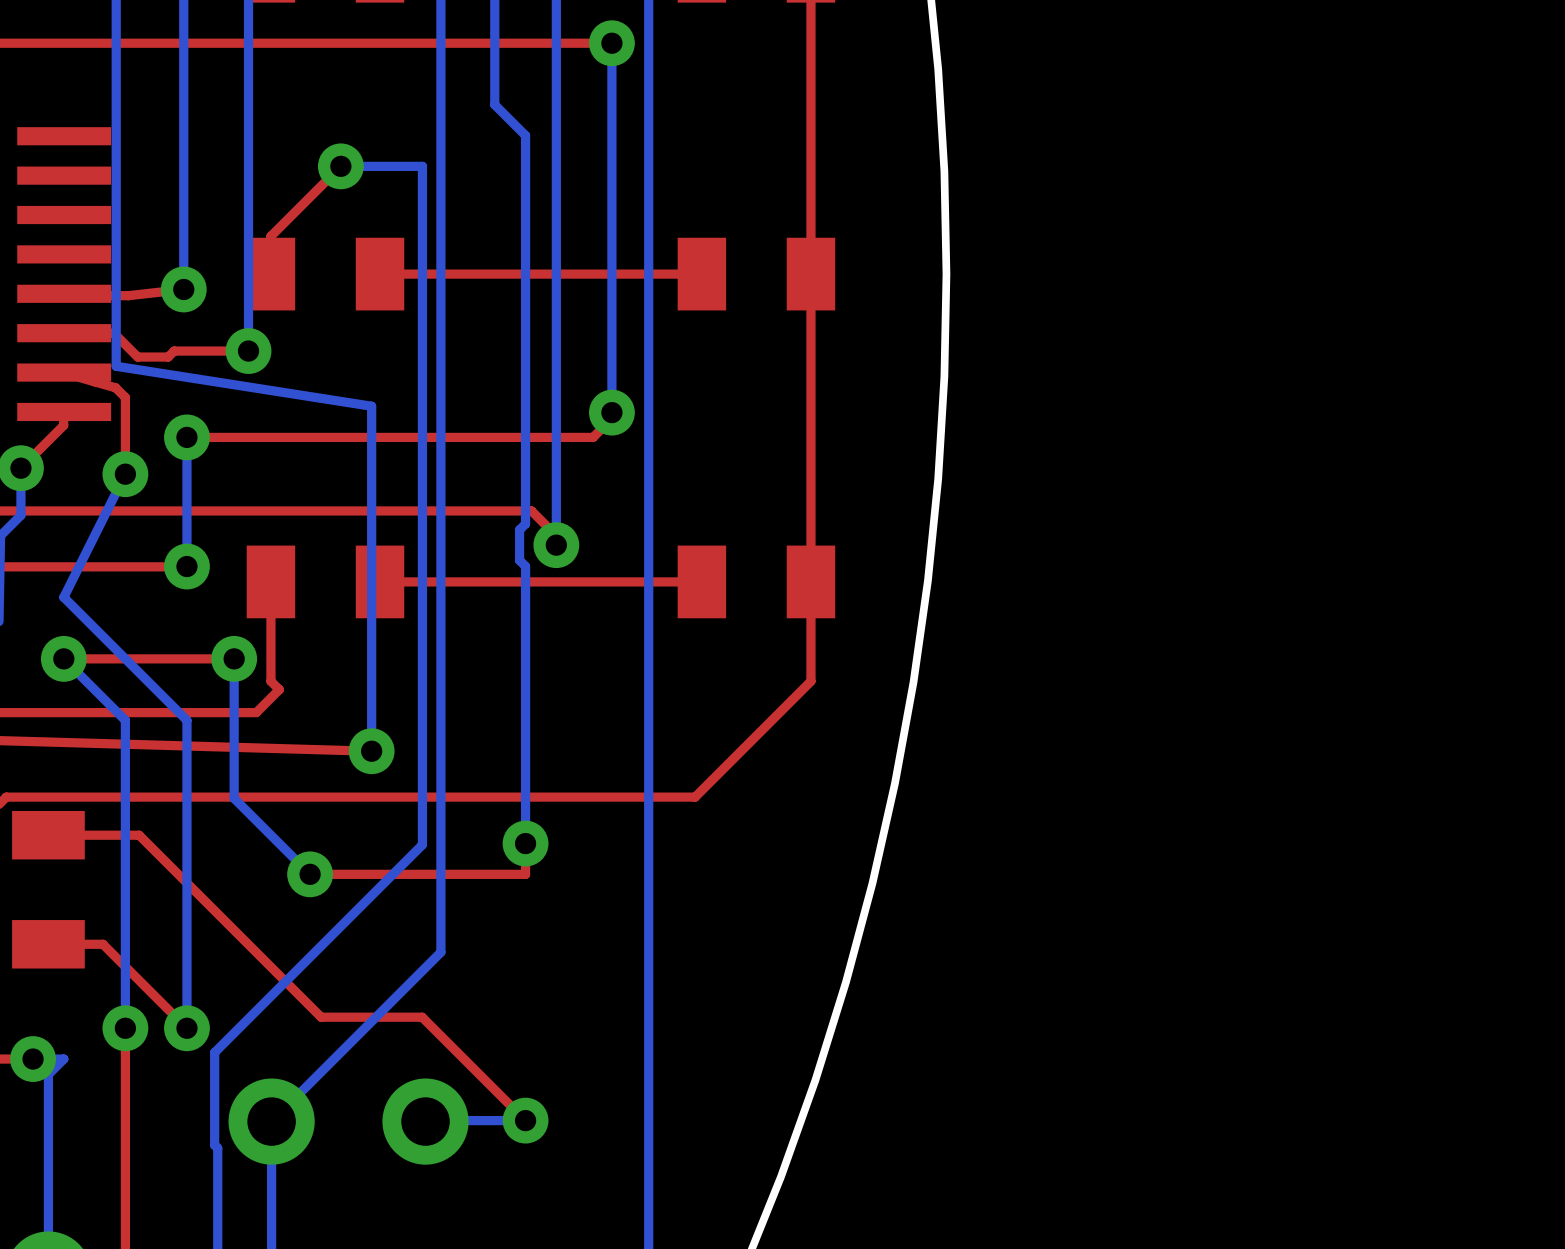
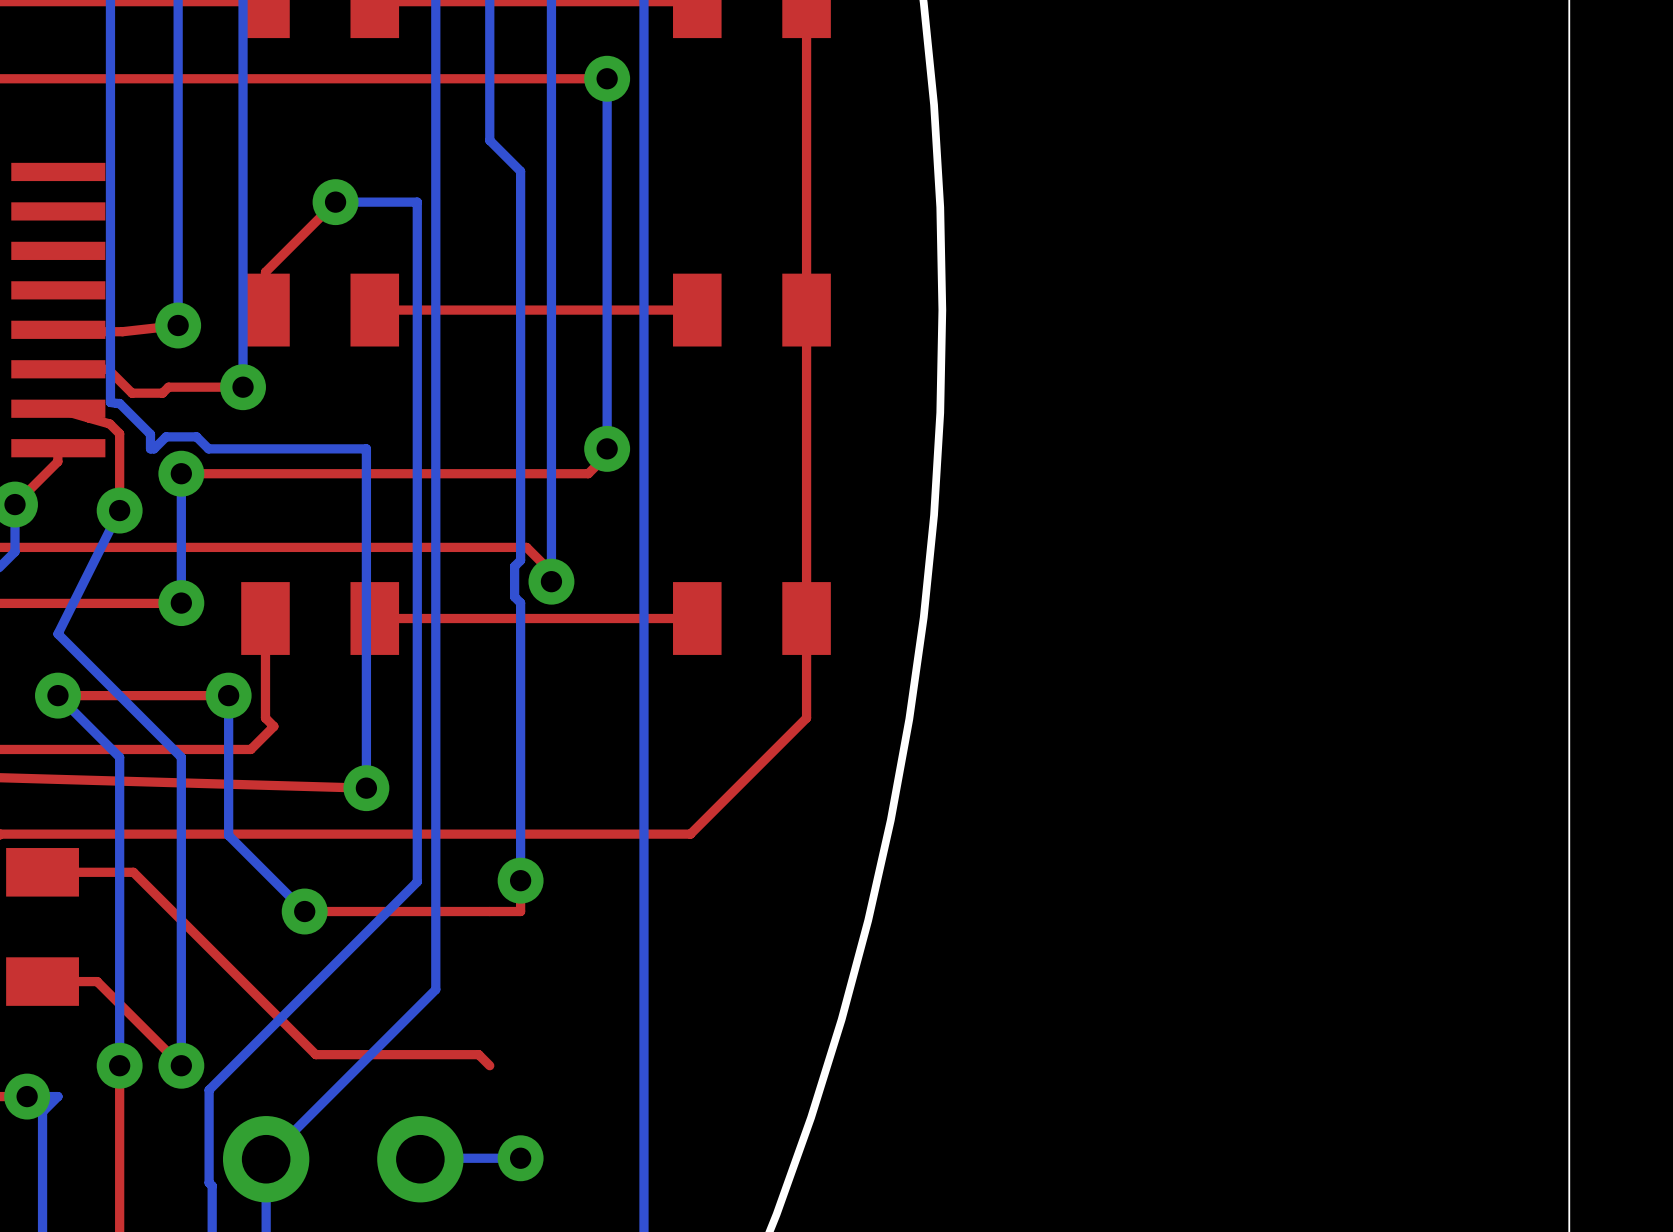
bottom track: (116, 366) (371, 406) (371, 412) -> (110, 402) (119, 403) (150, 434) (150, 448) (154, 448) (166, 436) (196, 436) (208, 448) (366, 448)
top track: (422, 1017) (525, 1120) -> (417, 1054) (478, 1054) (489, 1065)

